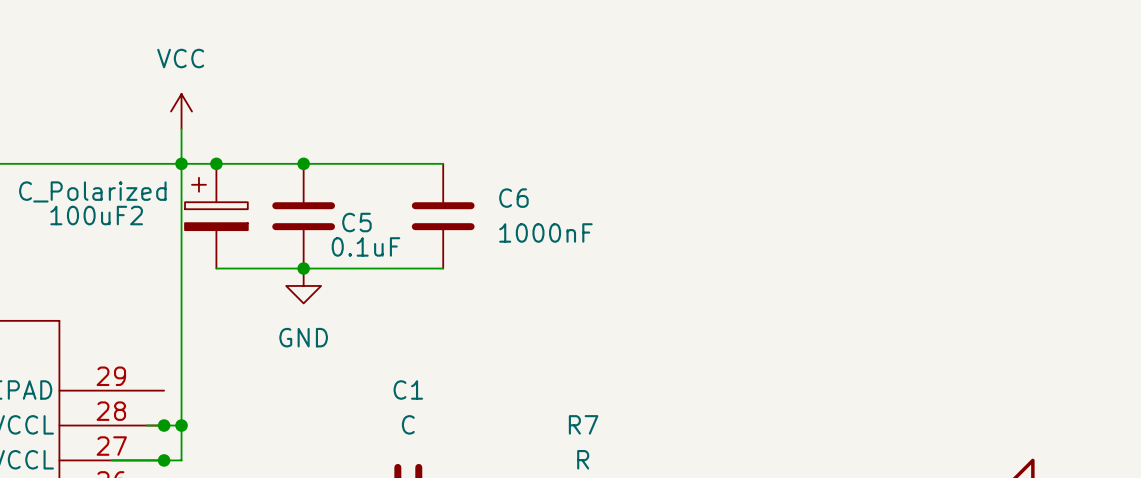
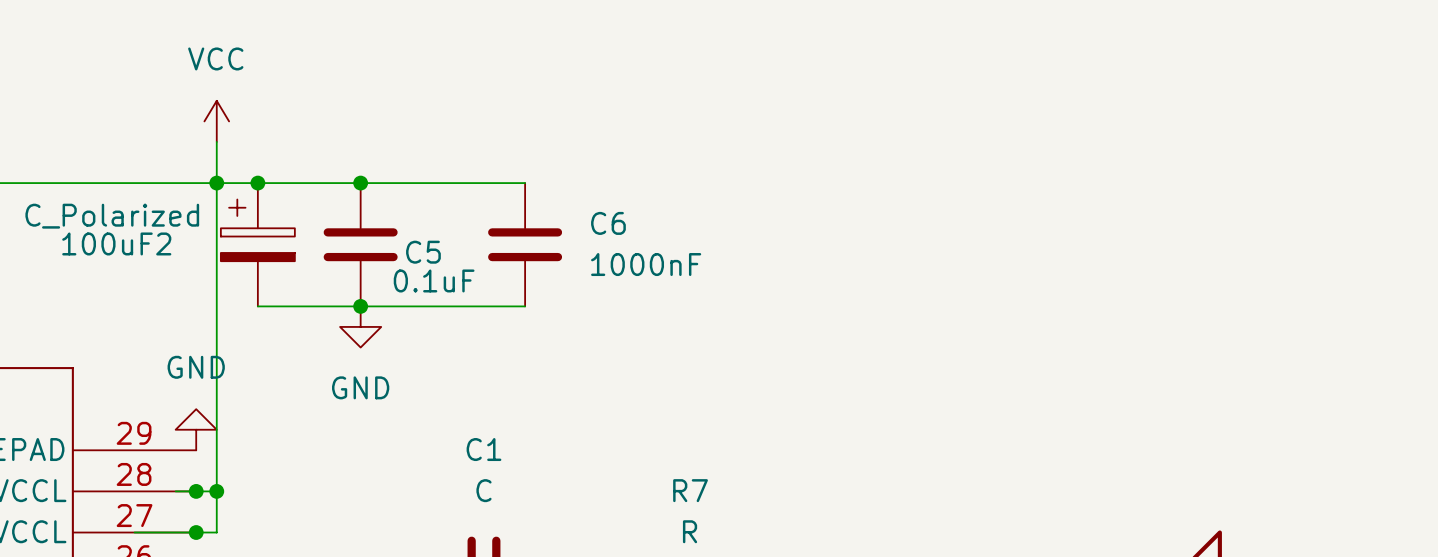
power symbol: none -> GND (196, 429)

